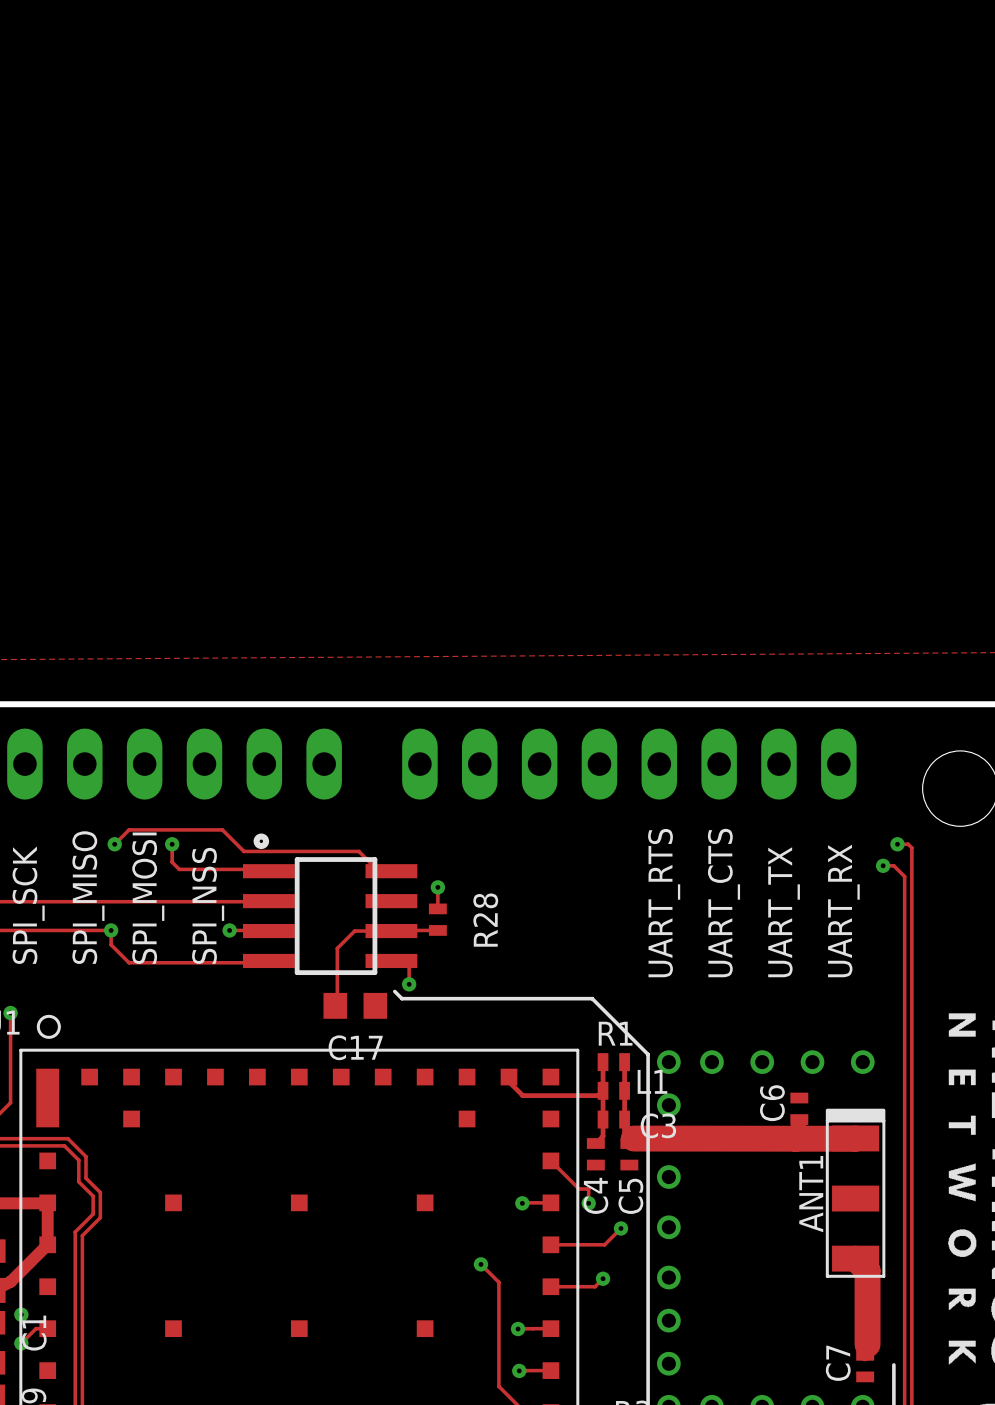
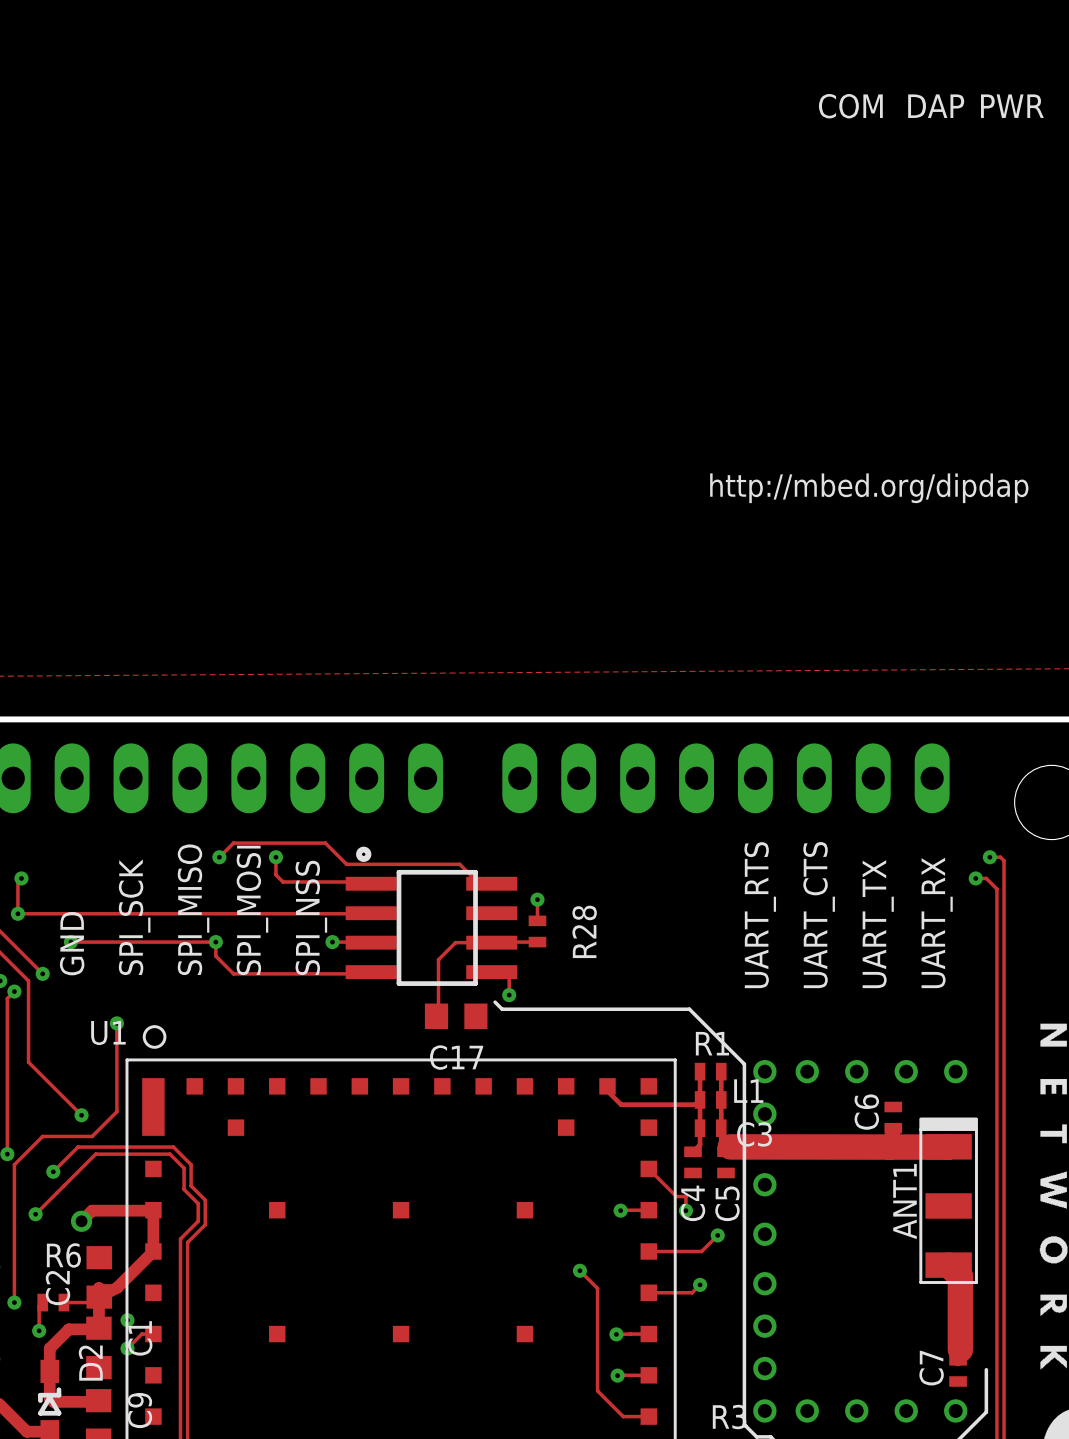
text: none -> COM (850, 106)
text: none -> DAP (936, 106)
text: none -> PWR (1012, 106)
text: none -> http://mbed.org/dipdap (869, 488)

